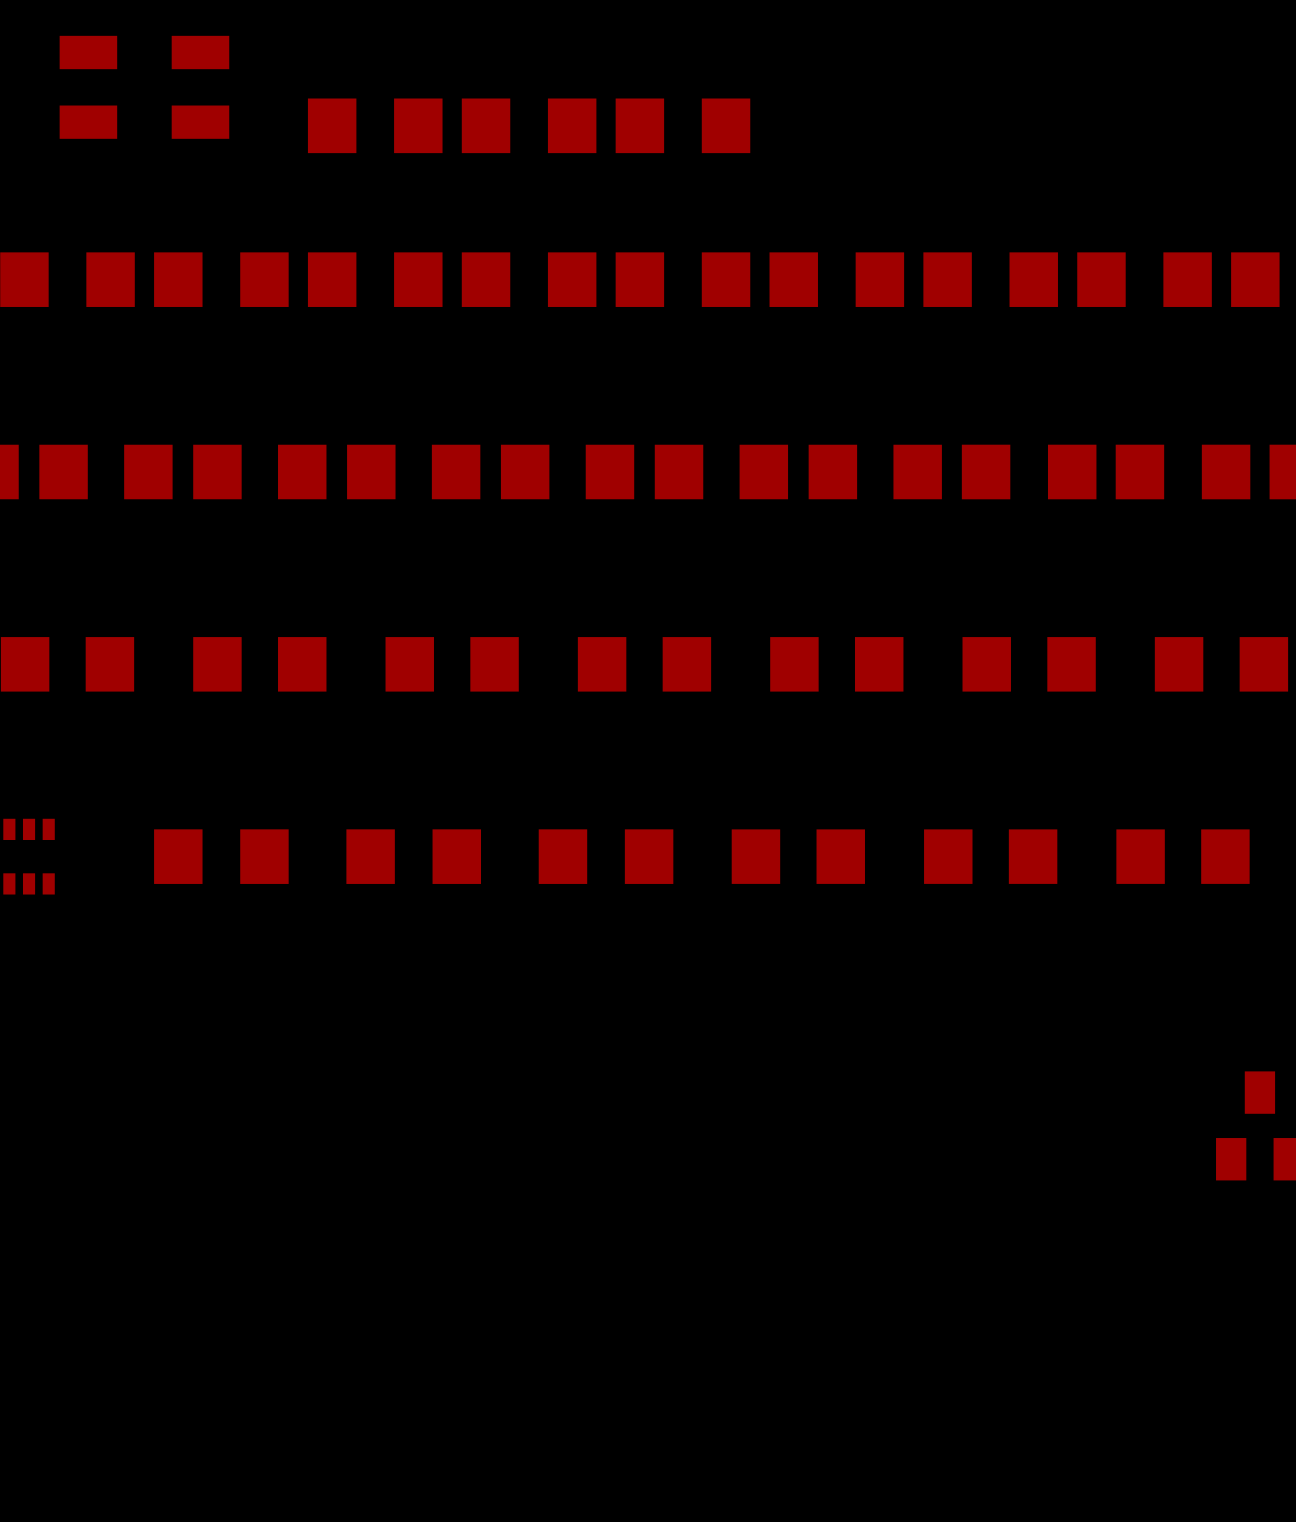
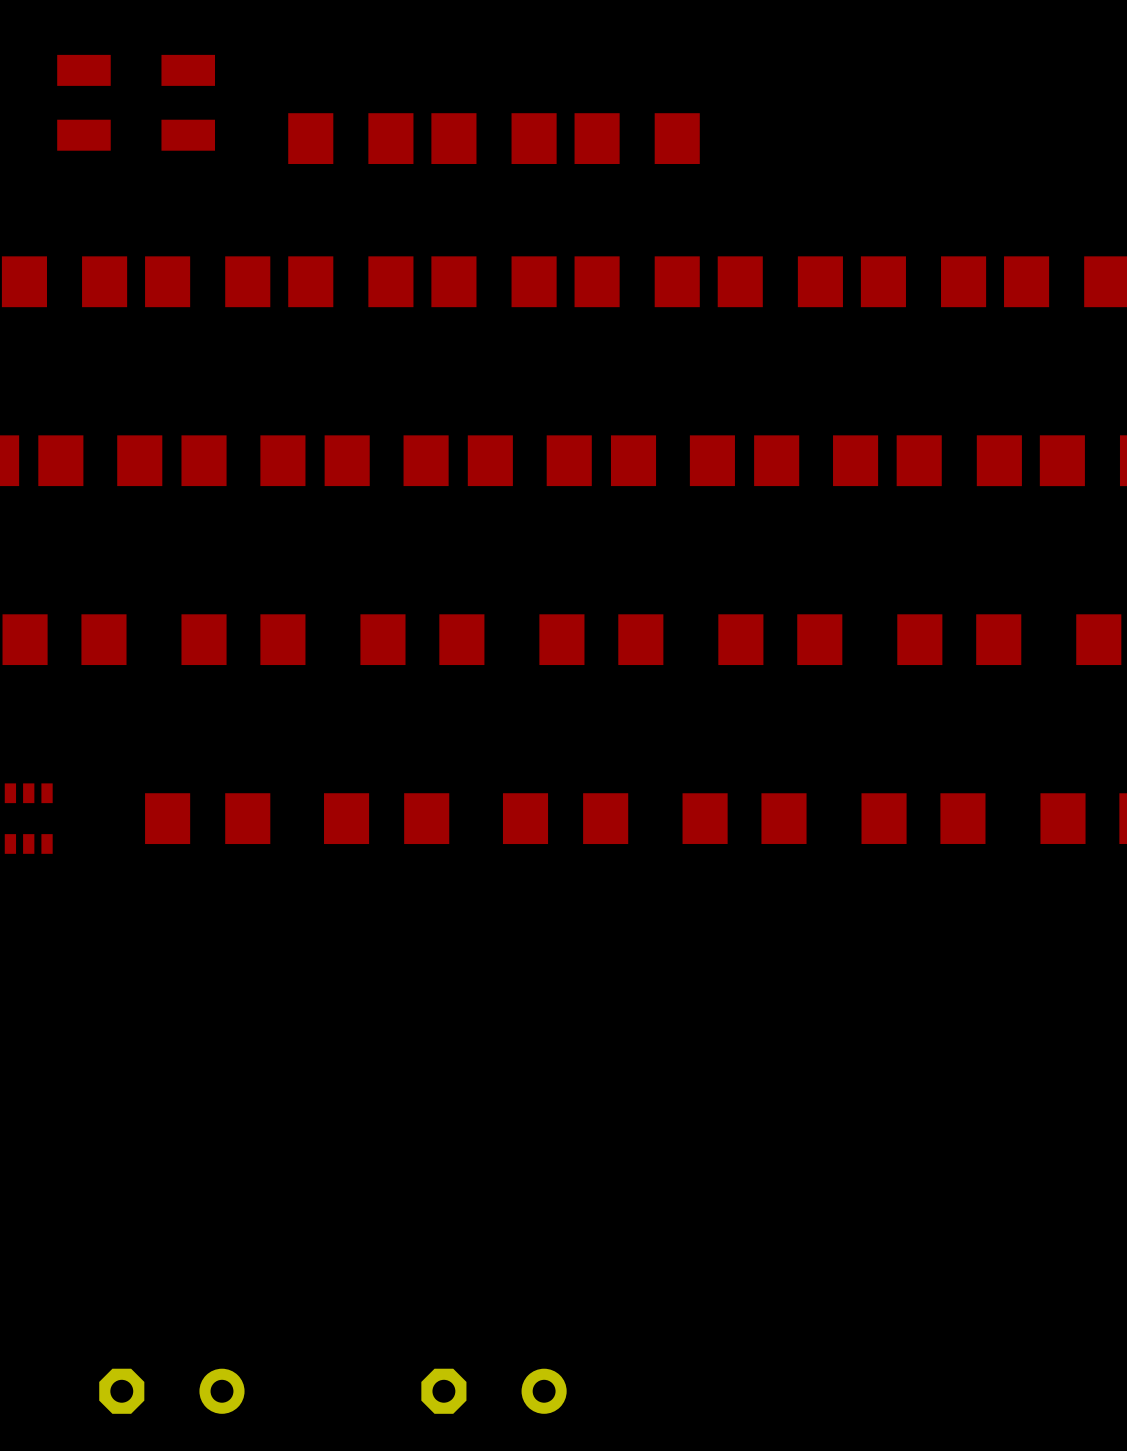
part: none -> (171, 1391)
part: none -> (494, 1391)

